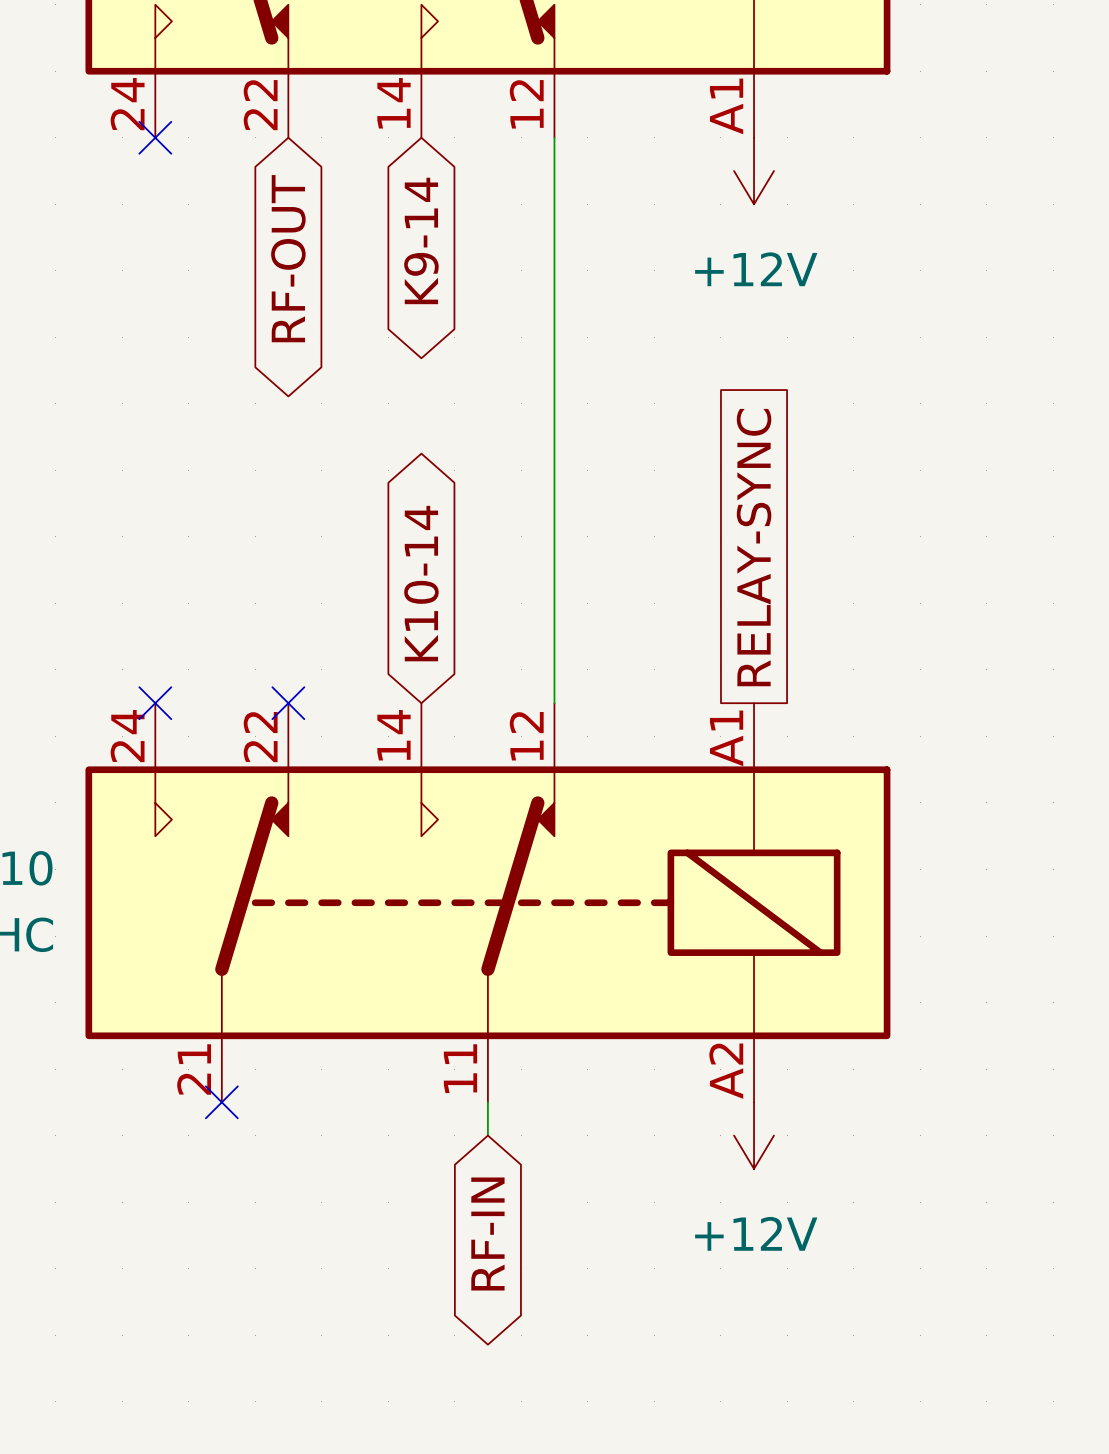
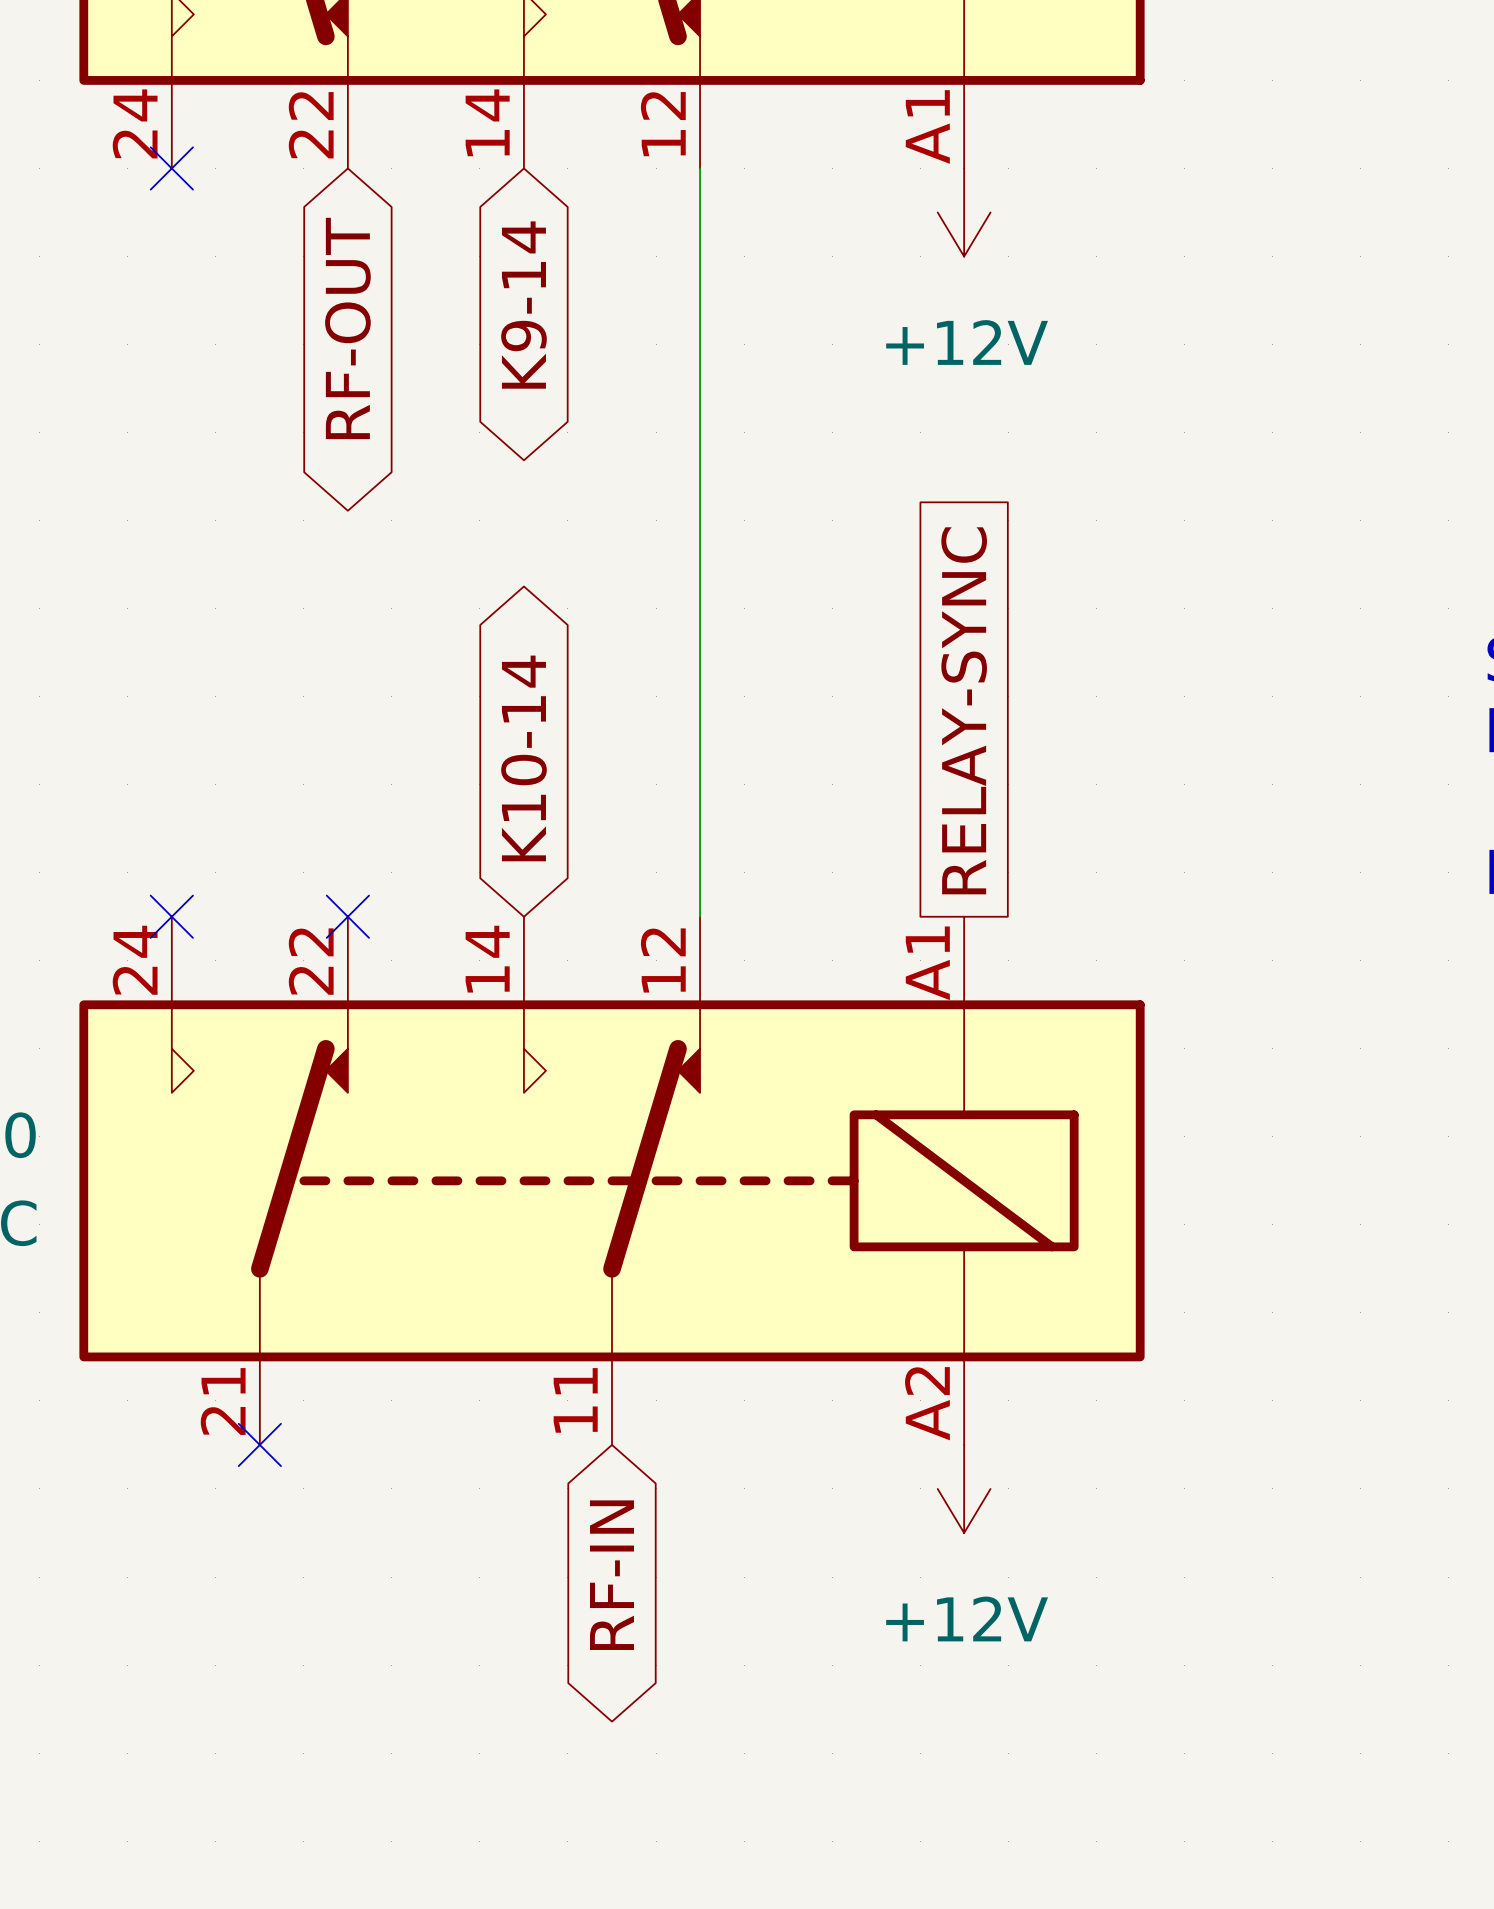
wire: (487, 1102) (487, 1135) -> none
global label position: RF-IN (487, 1234) -> RF-IN (611, 1575)

